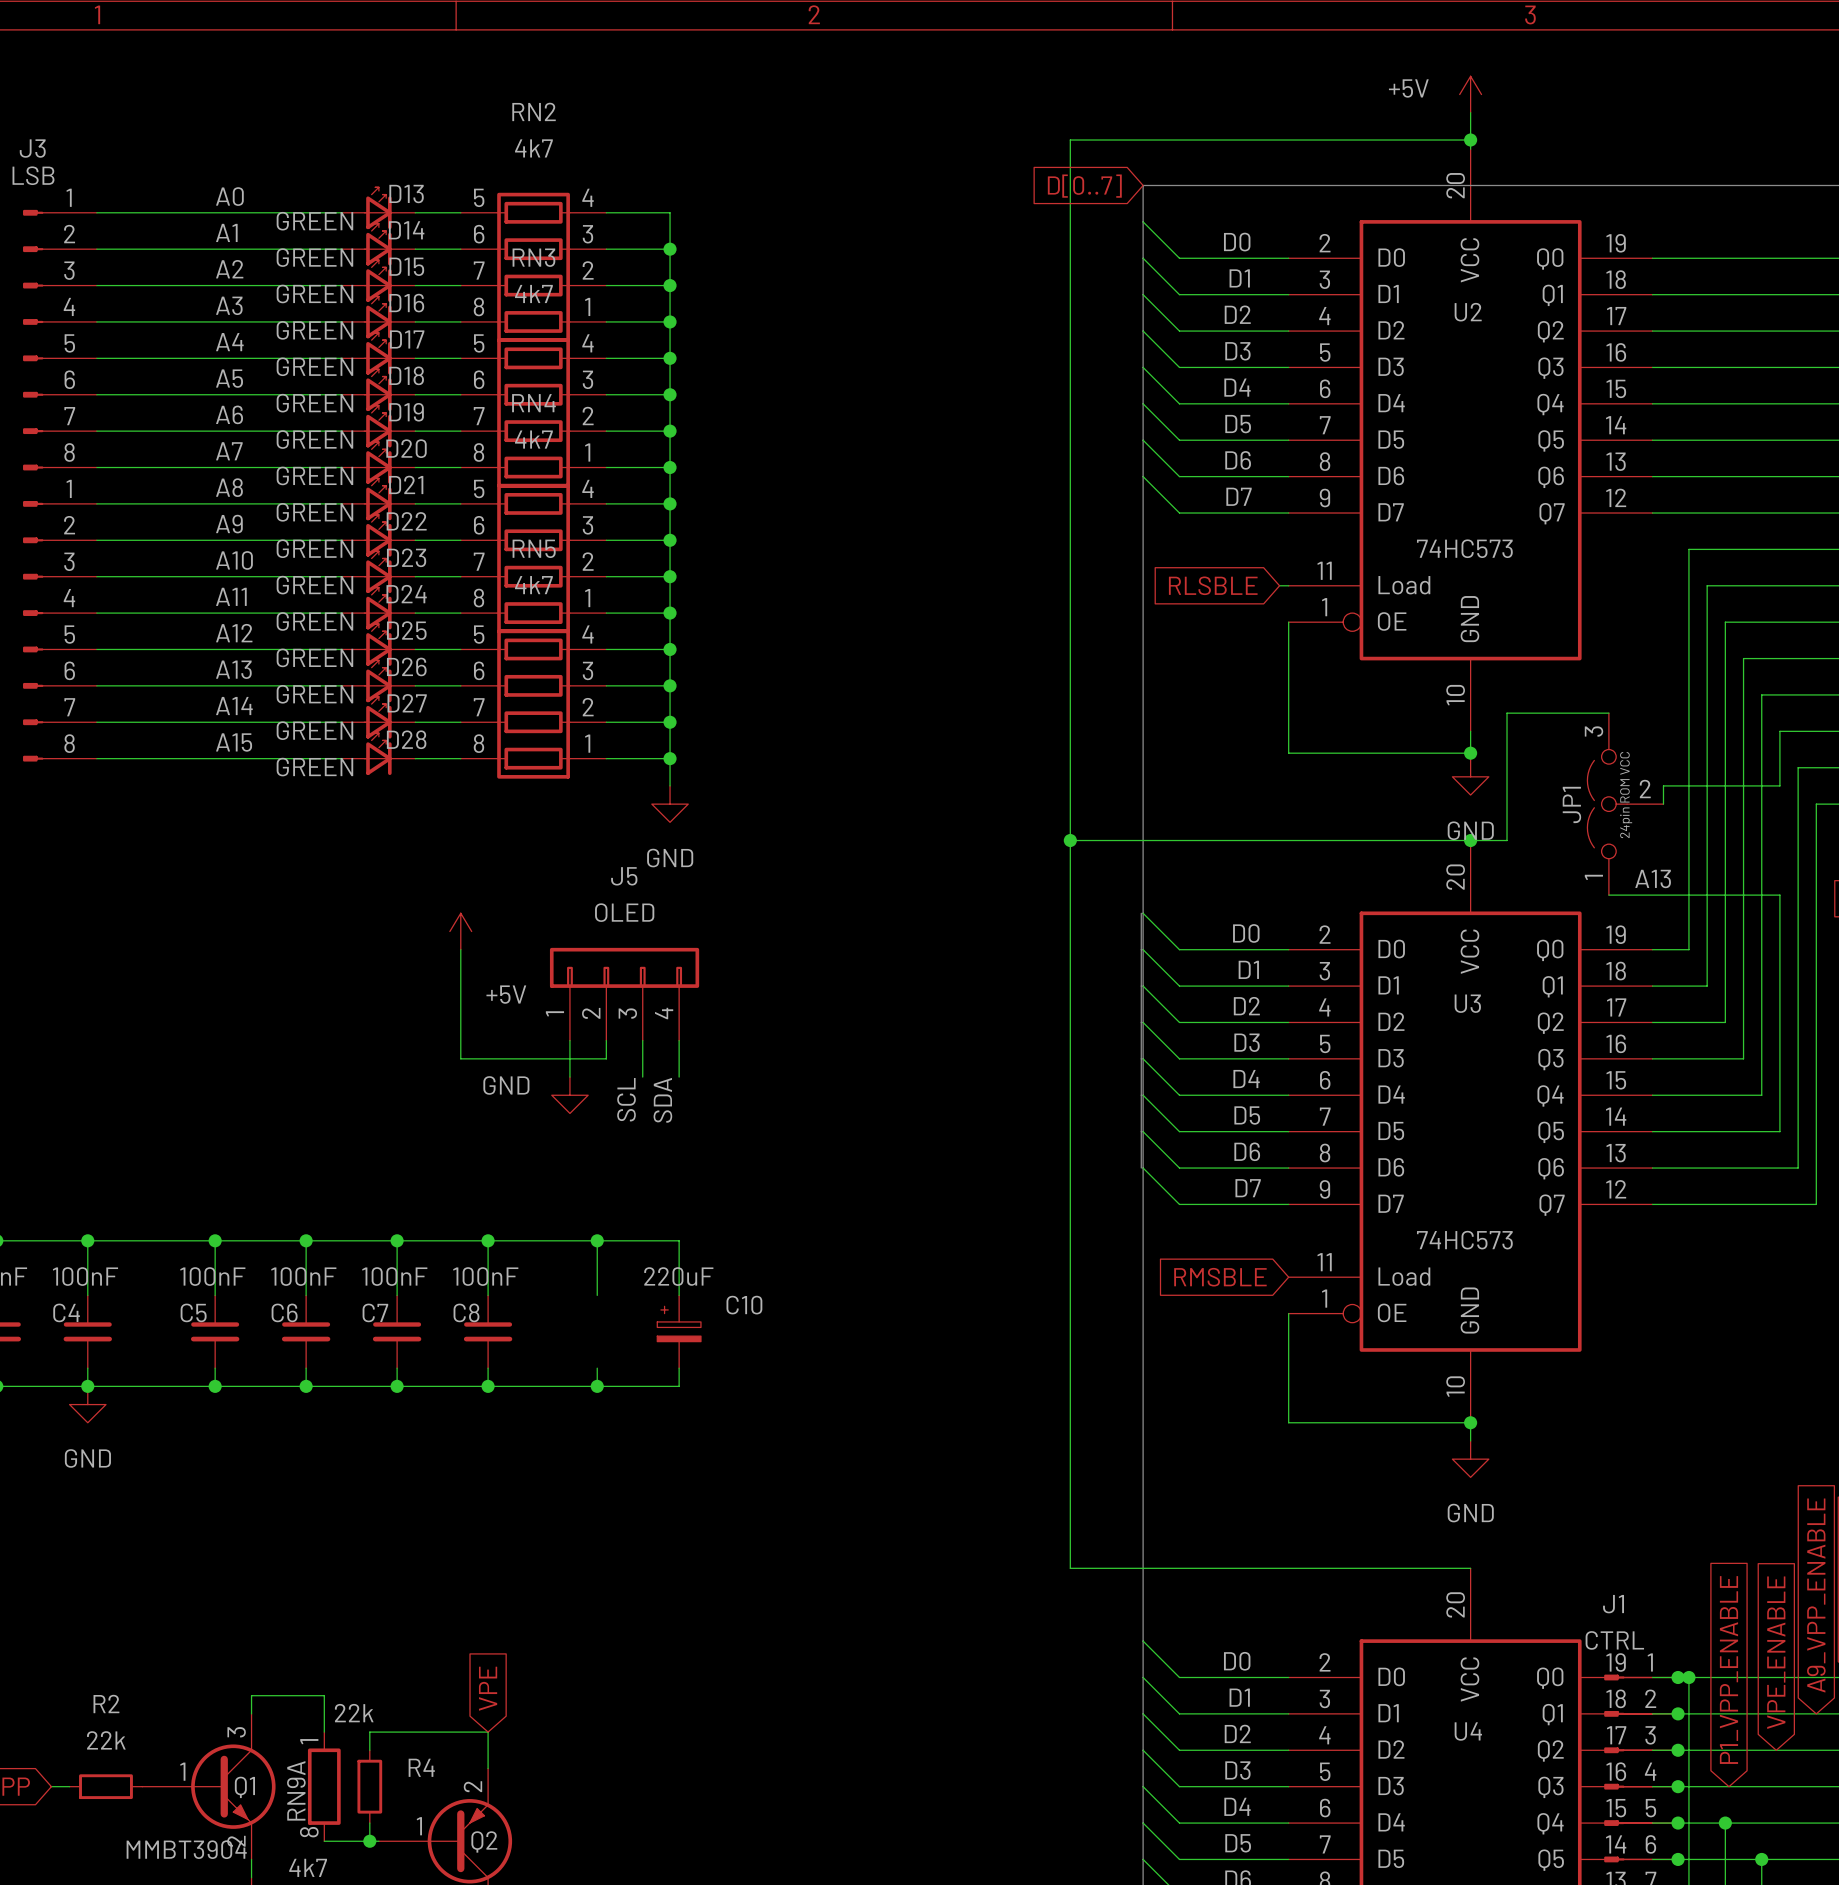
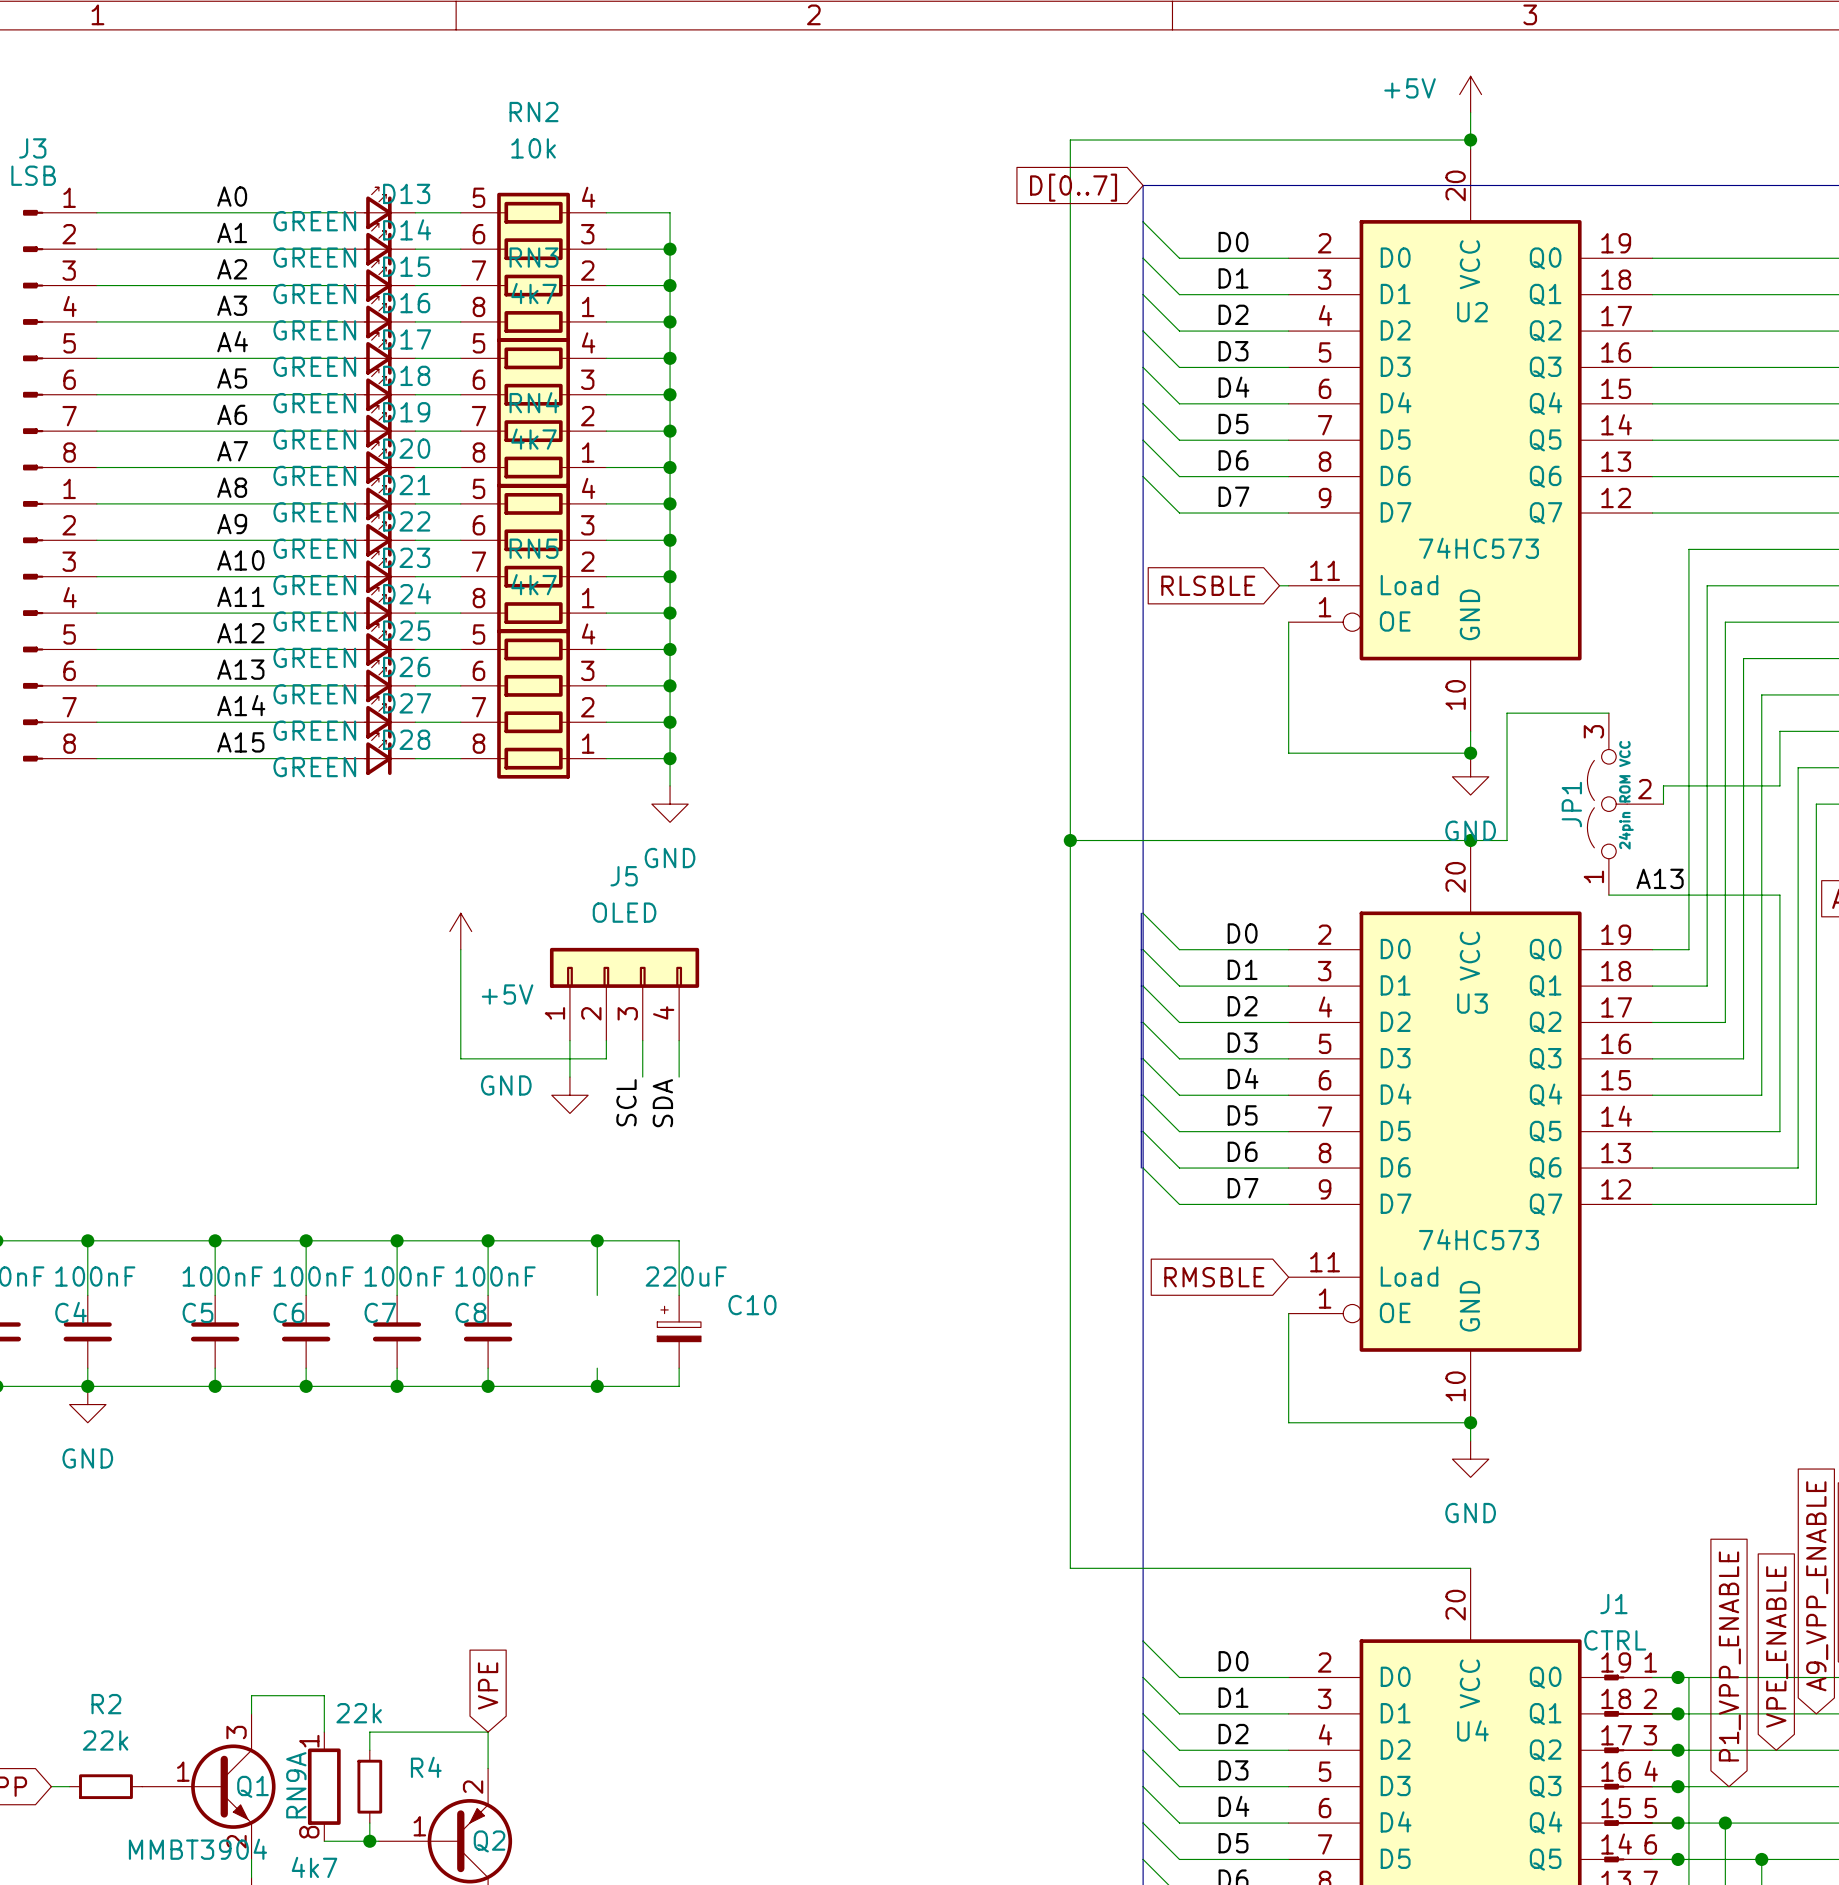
RN2 value: 4k7 (533, 148) -> 10k (533, 148)
junction: (1688, 1677) -> none

